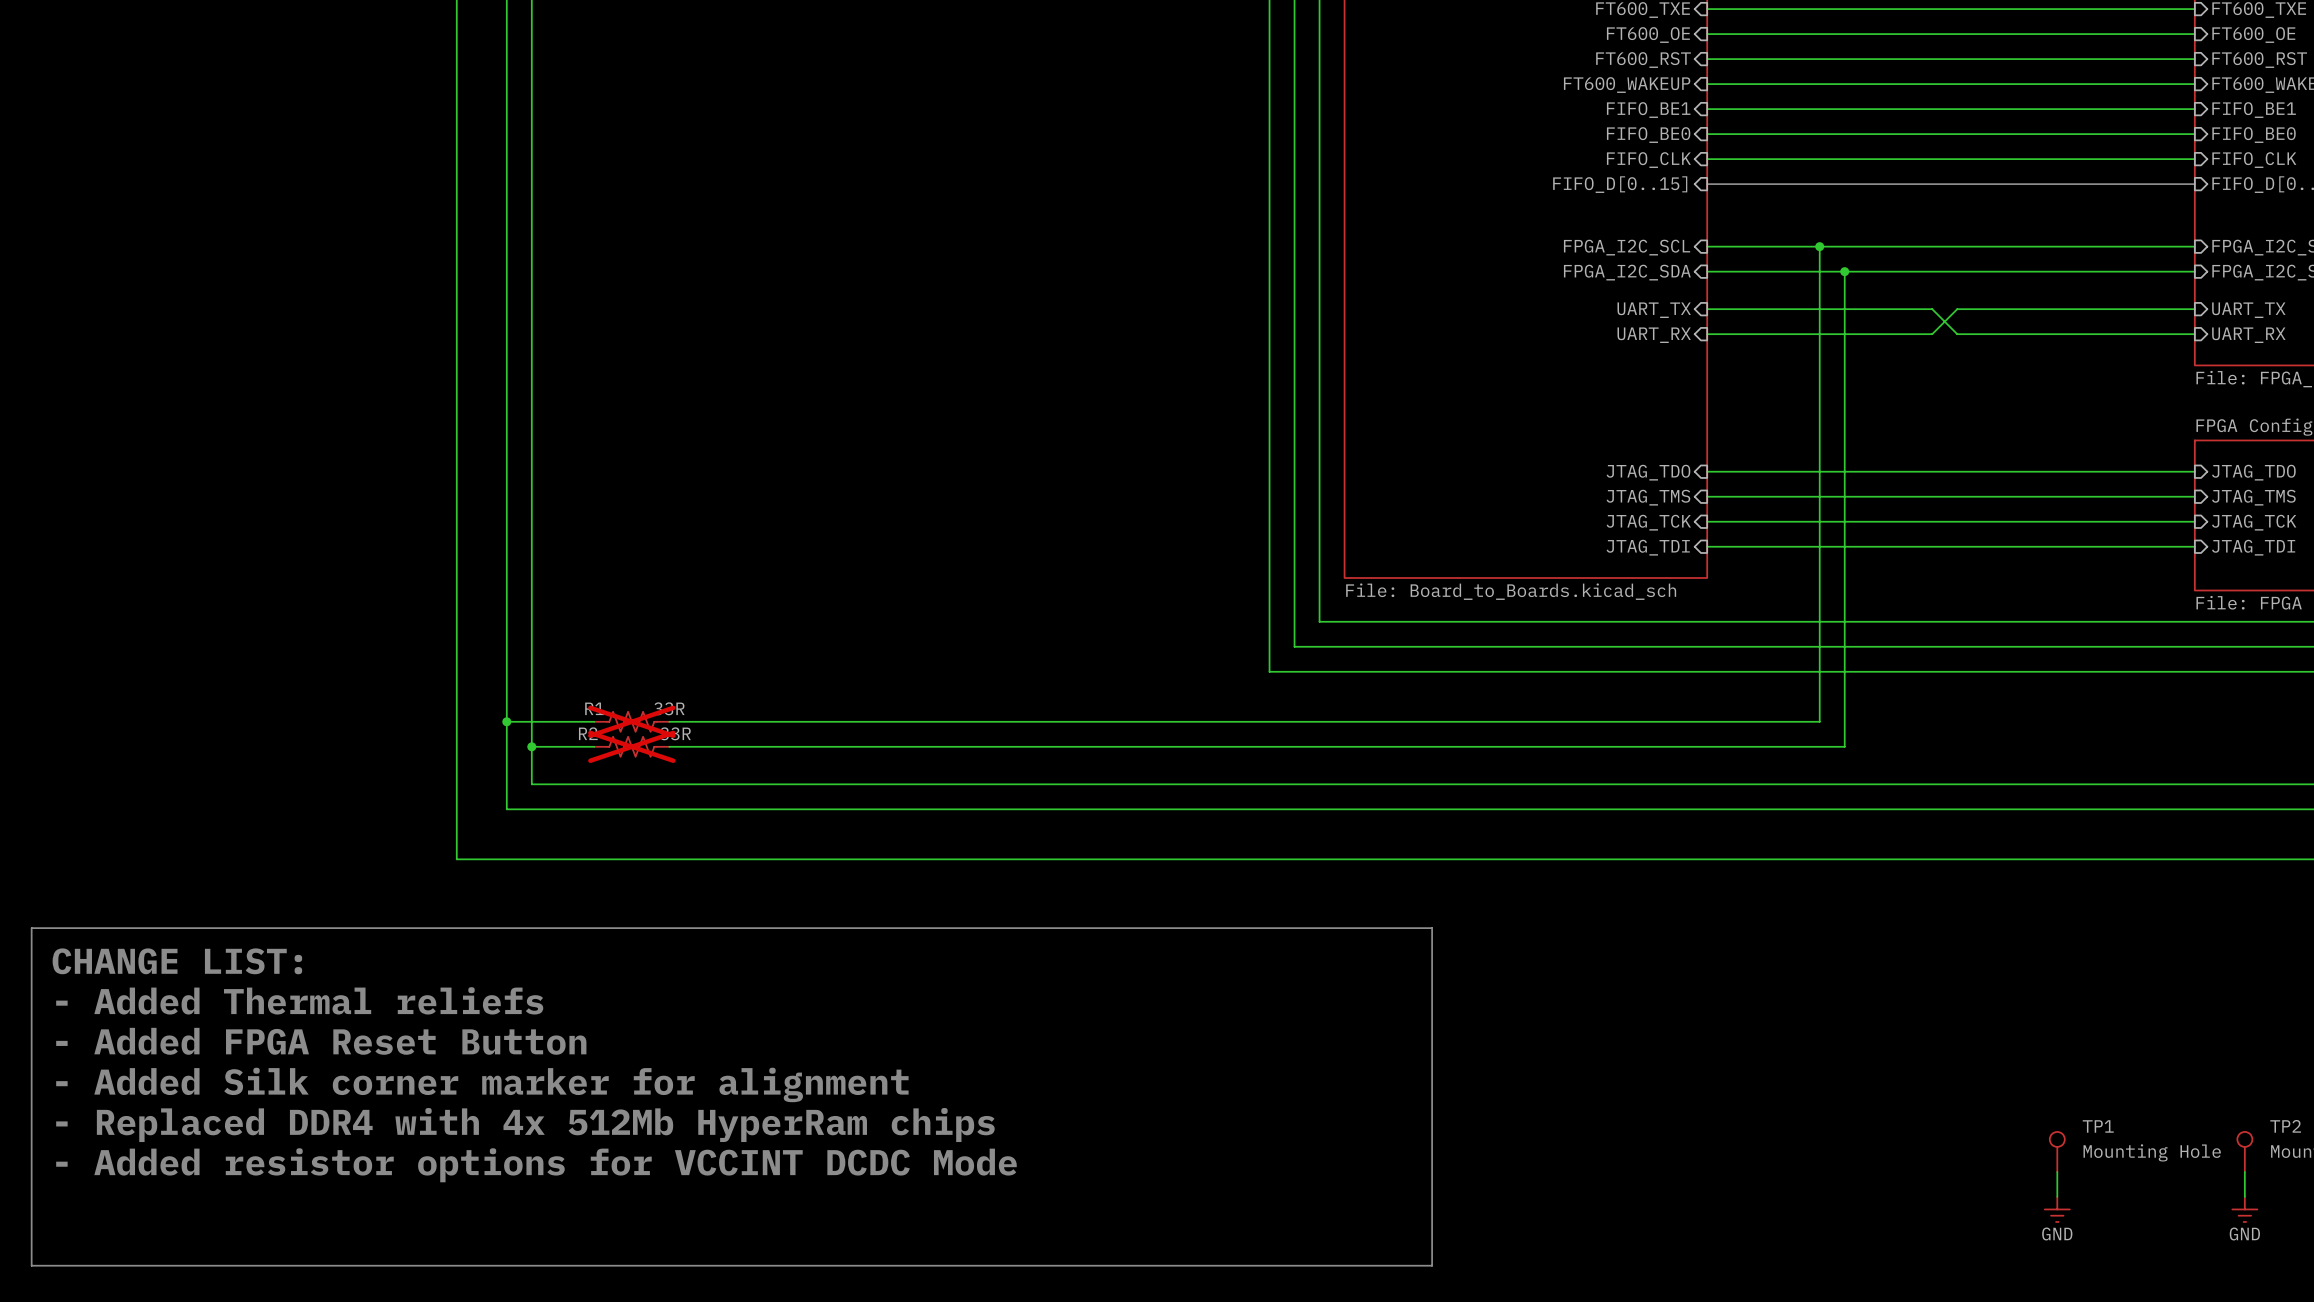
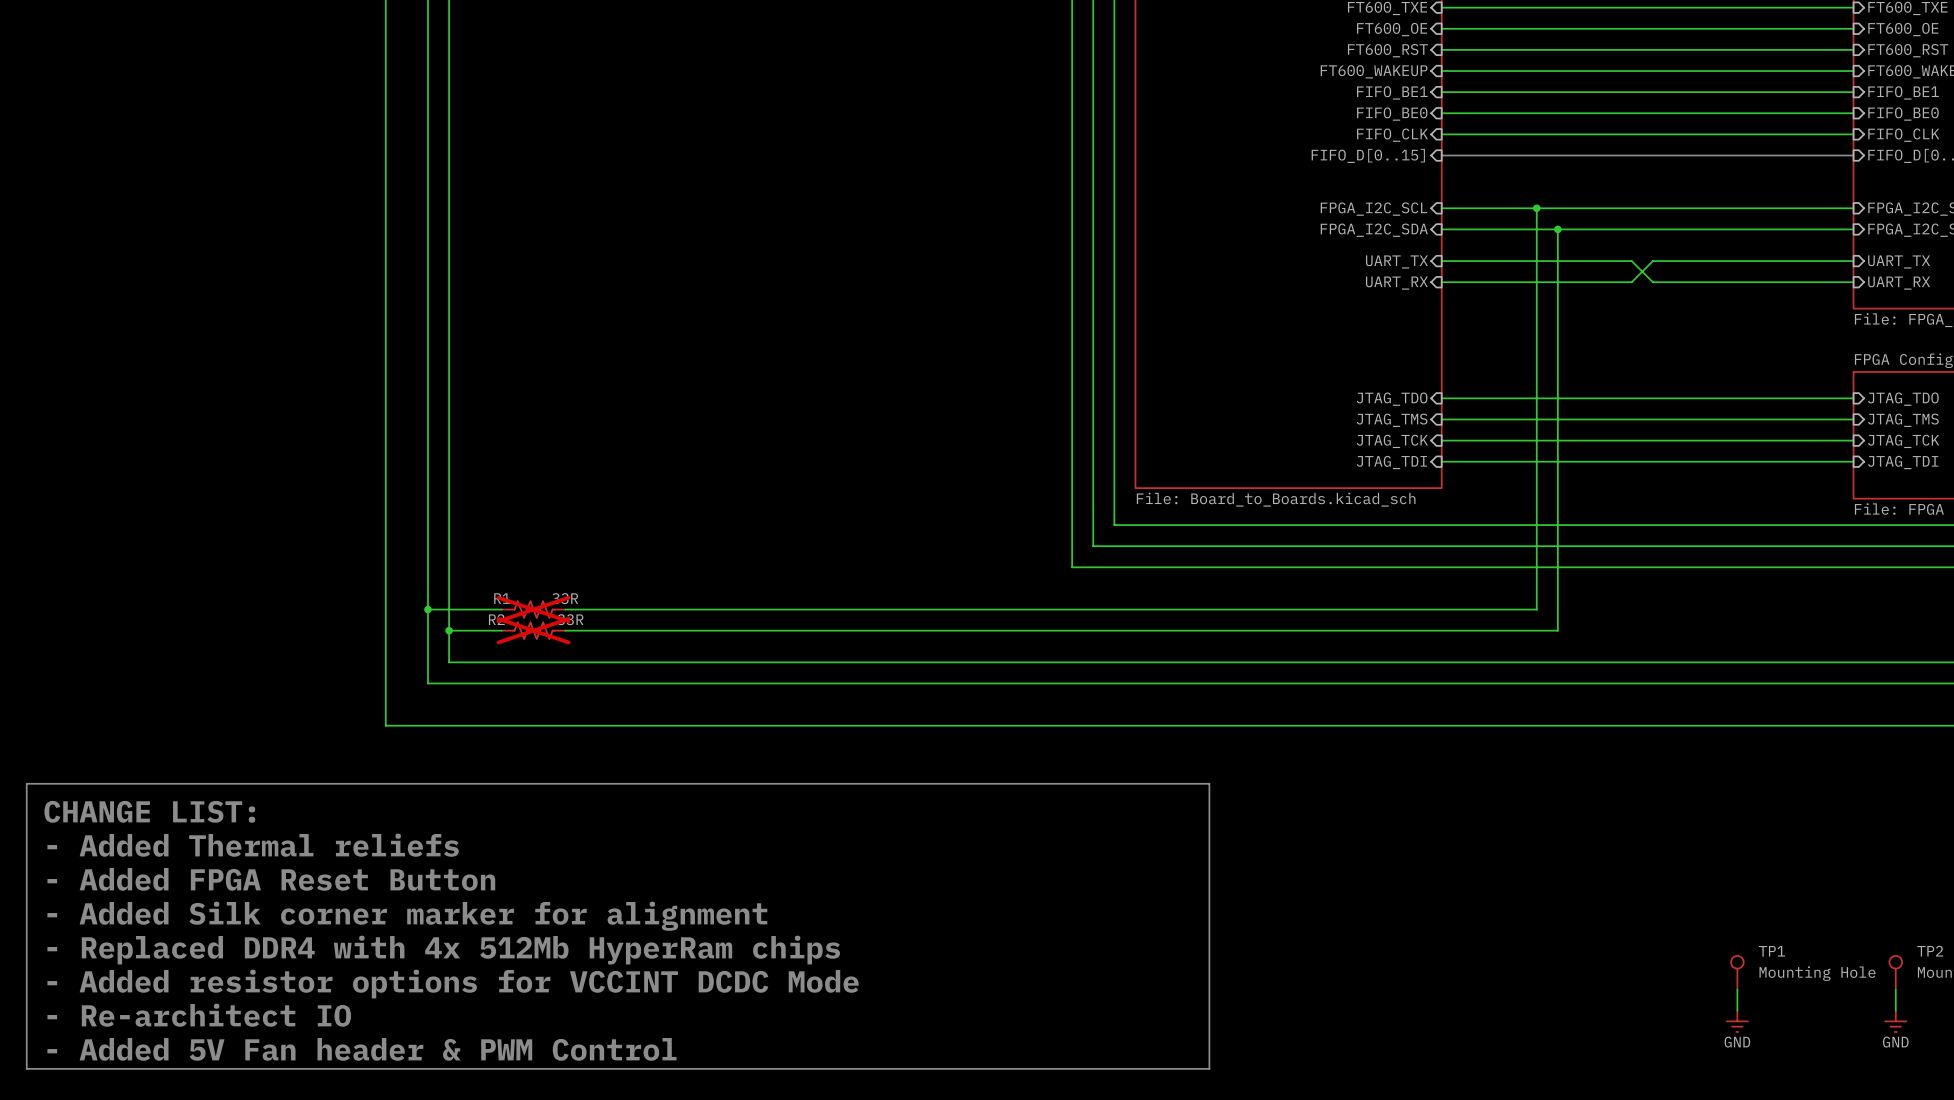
text: none -> - Re-architect IO (199, 1015)
text: none -> - Added 5V Fan header & PWM Control (362, 1049)

